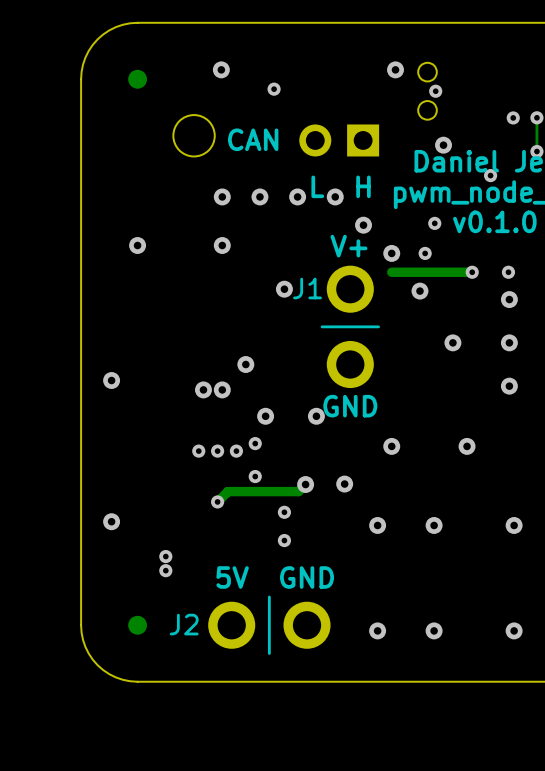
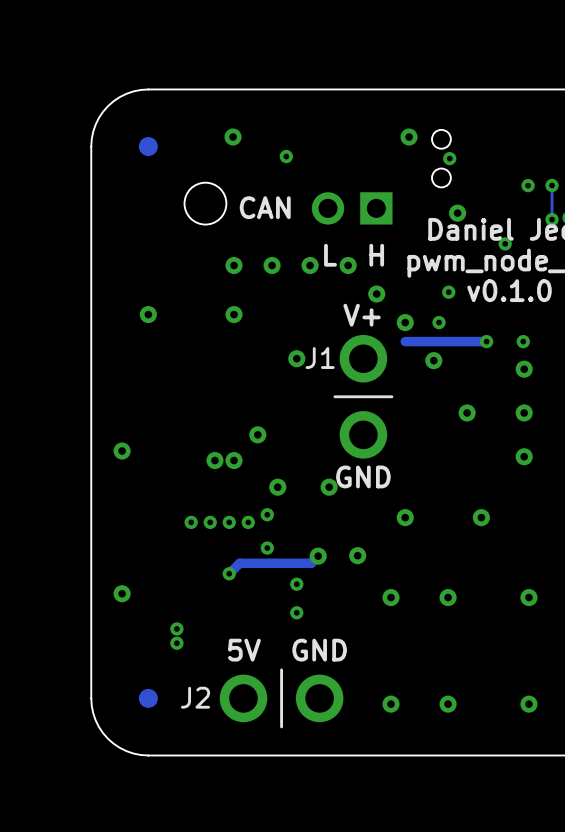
via: none -> (191, 522)

